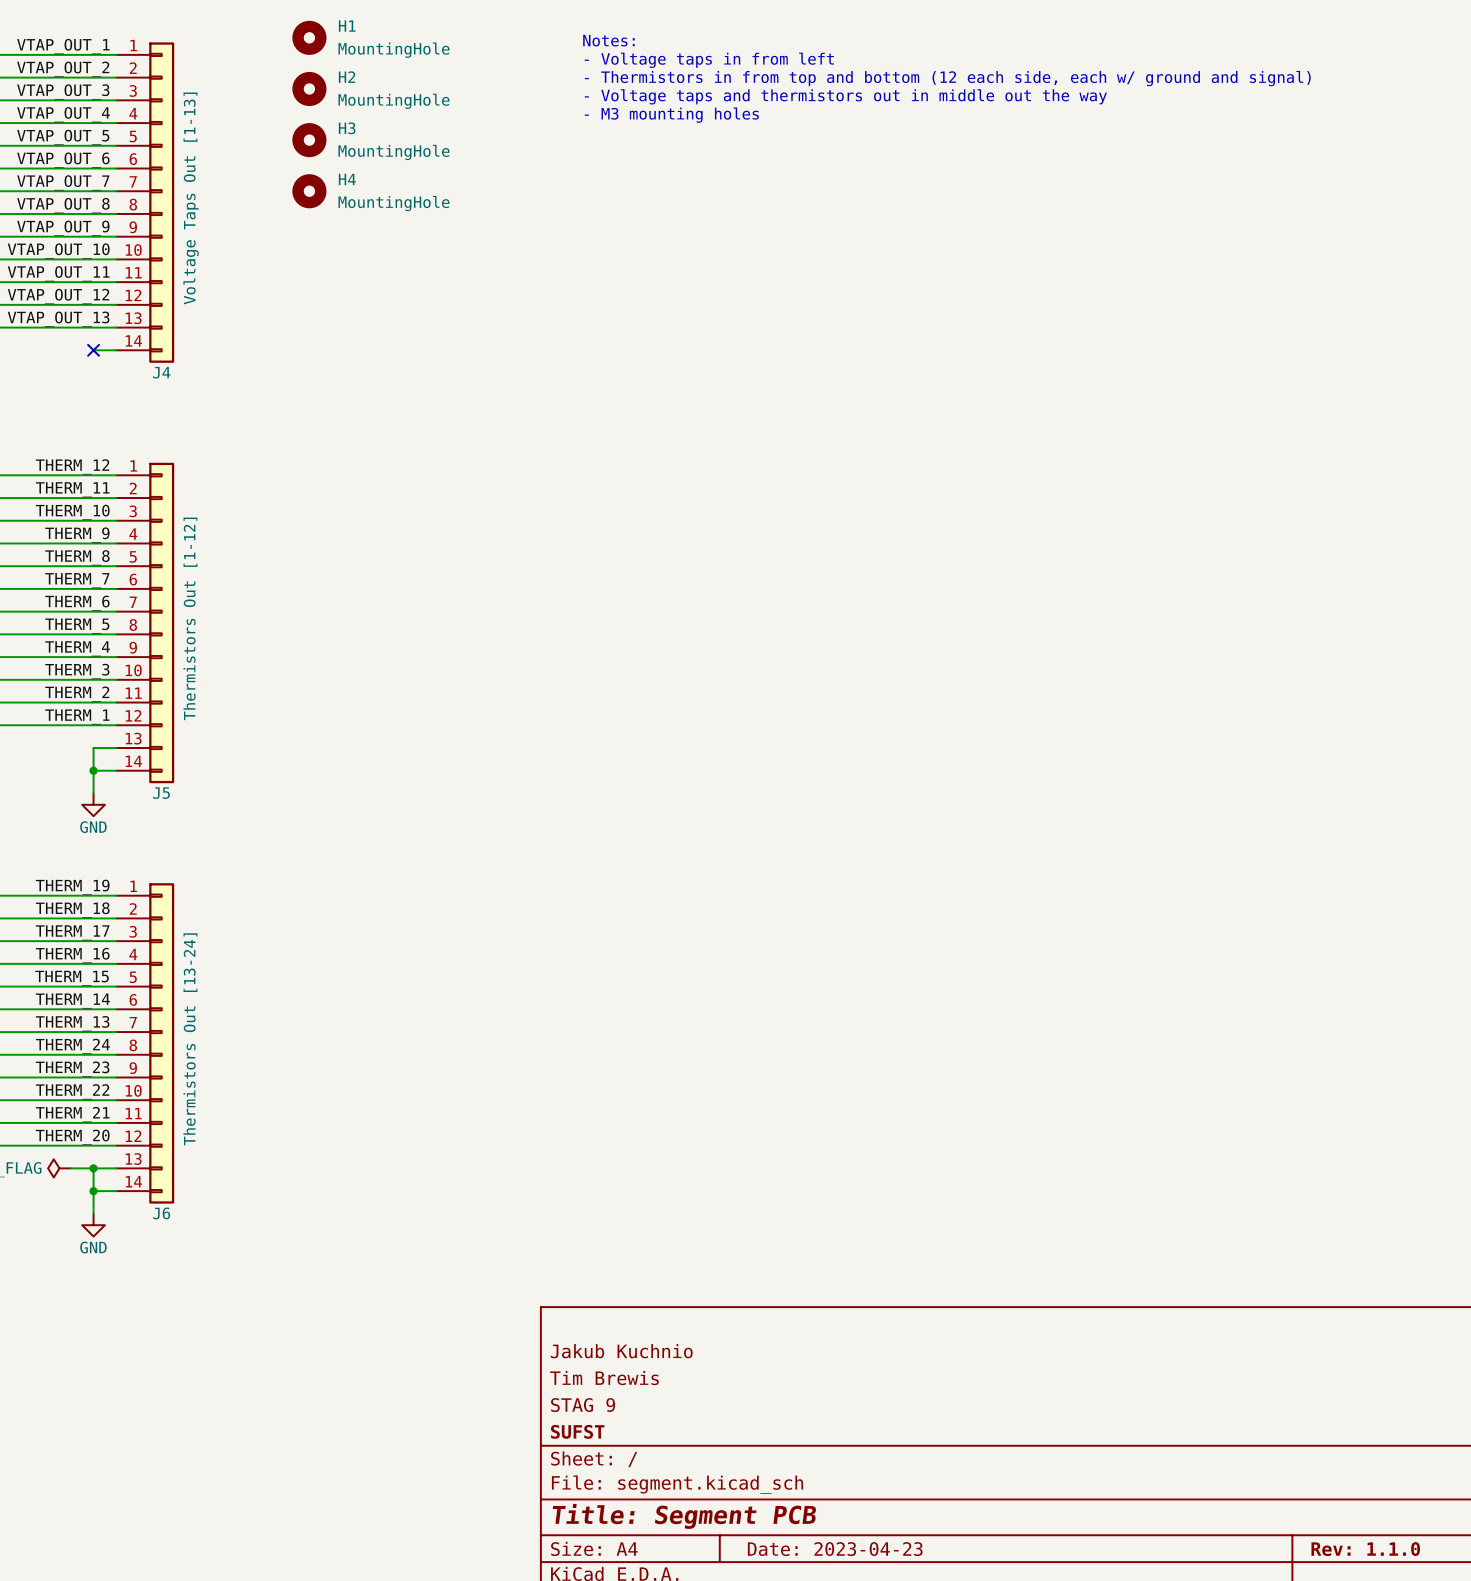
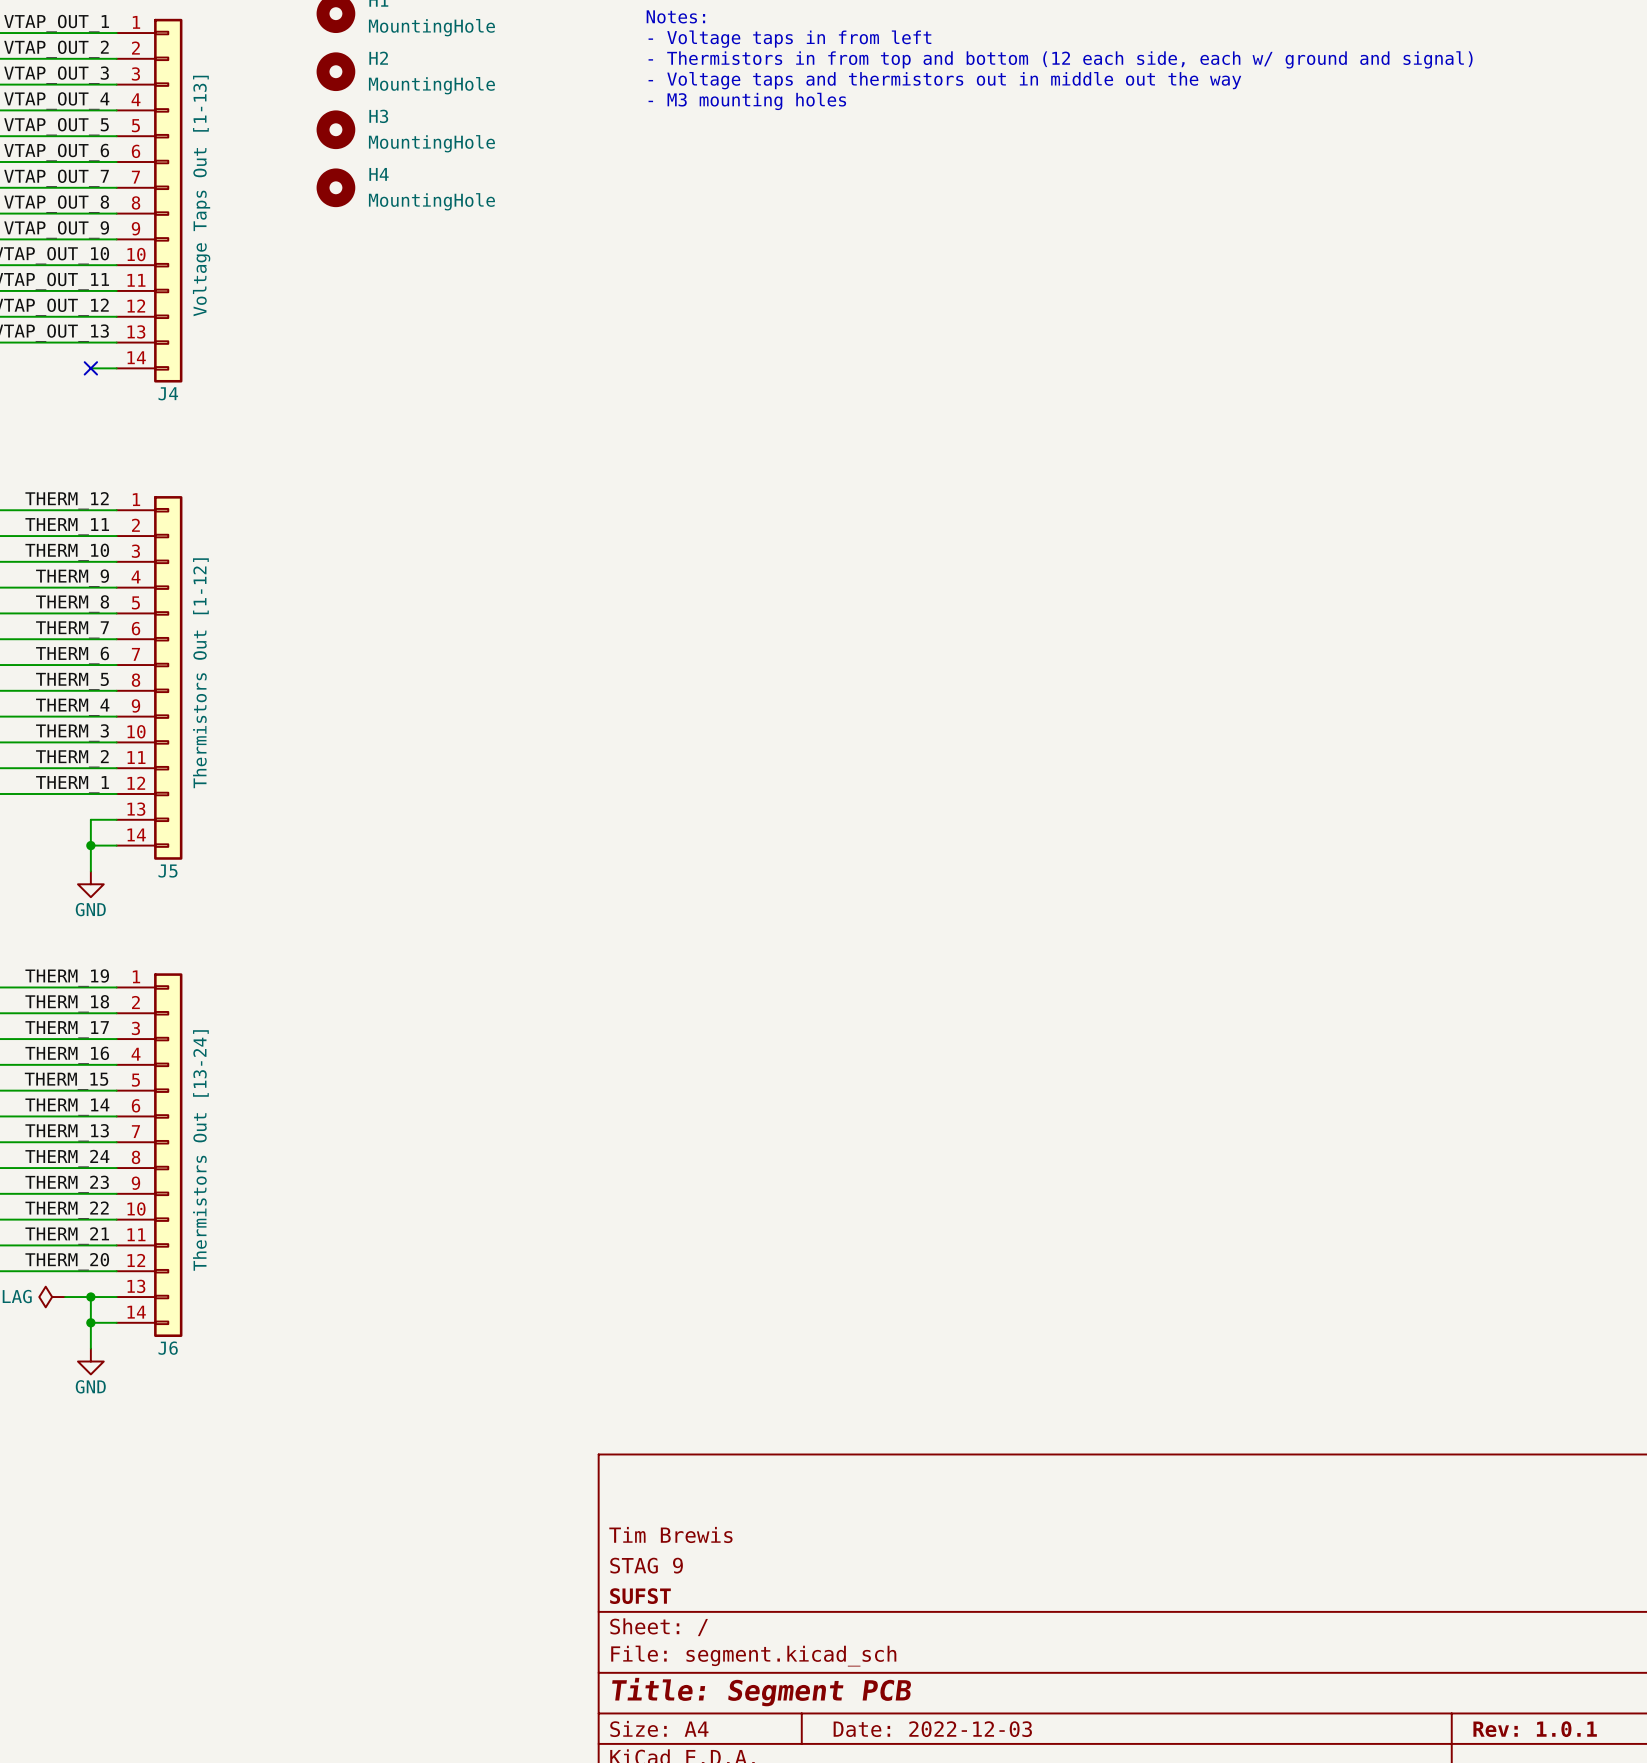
title block: Jakub Kuchnio (621, 1351) -> none
title block: Date: 2023-04-23 (835, 1549) -> Date: 2022-12-03 (932, 1729)
title block: Rev: 1.1.0 (1365, 1549) -> Rev: 1.0.1 (1535, 1729)

